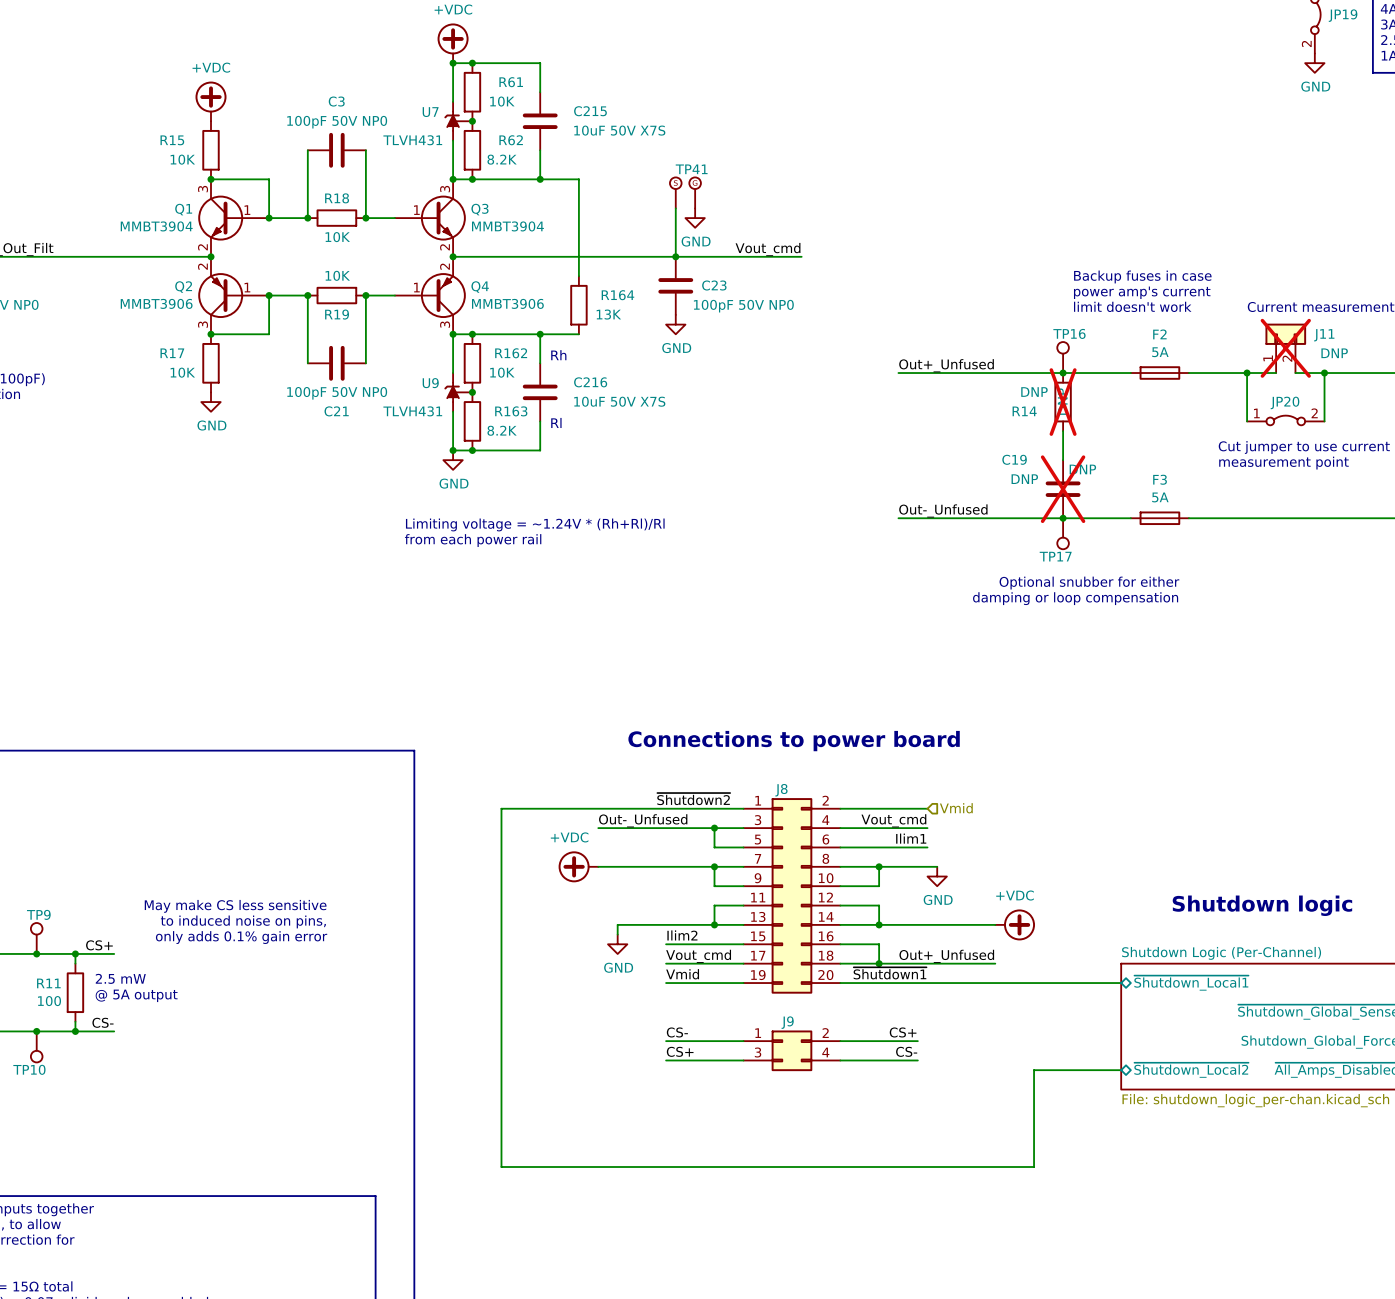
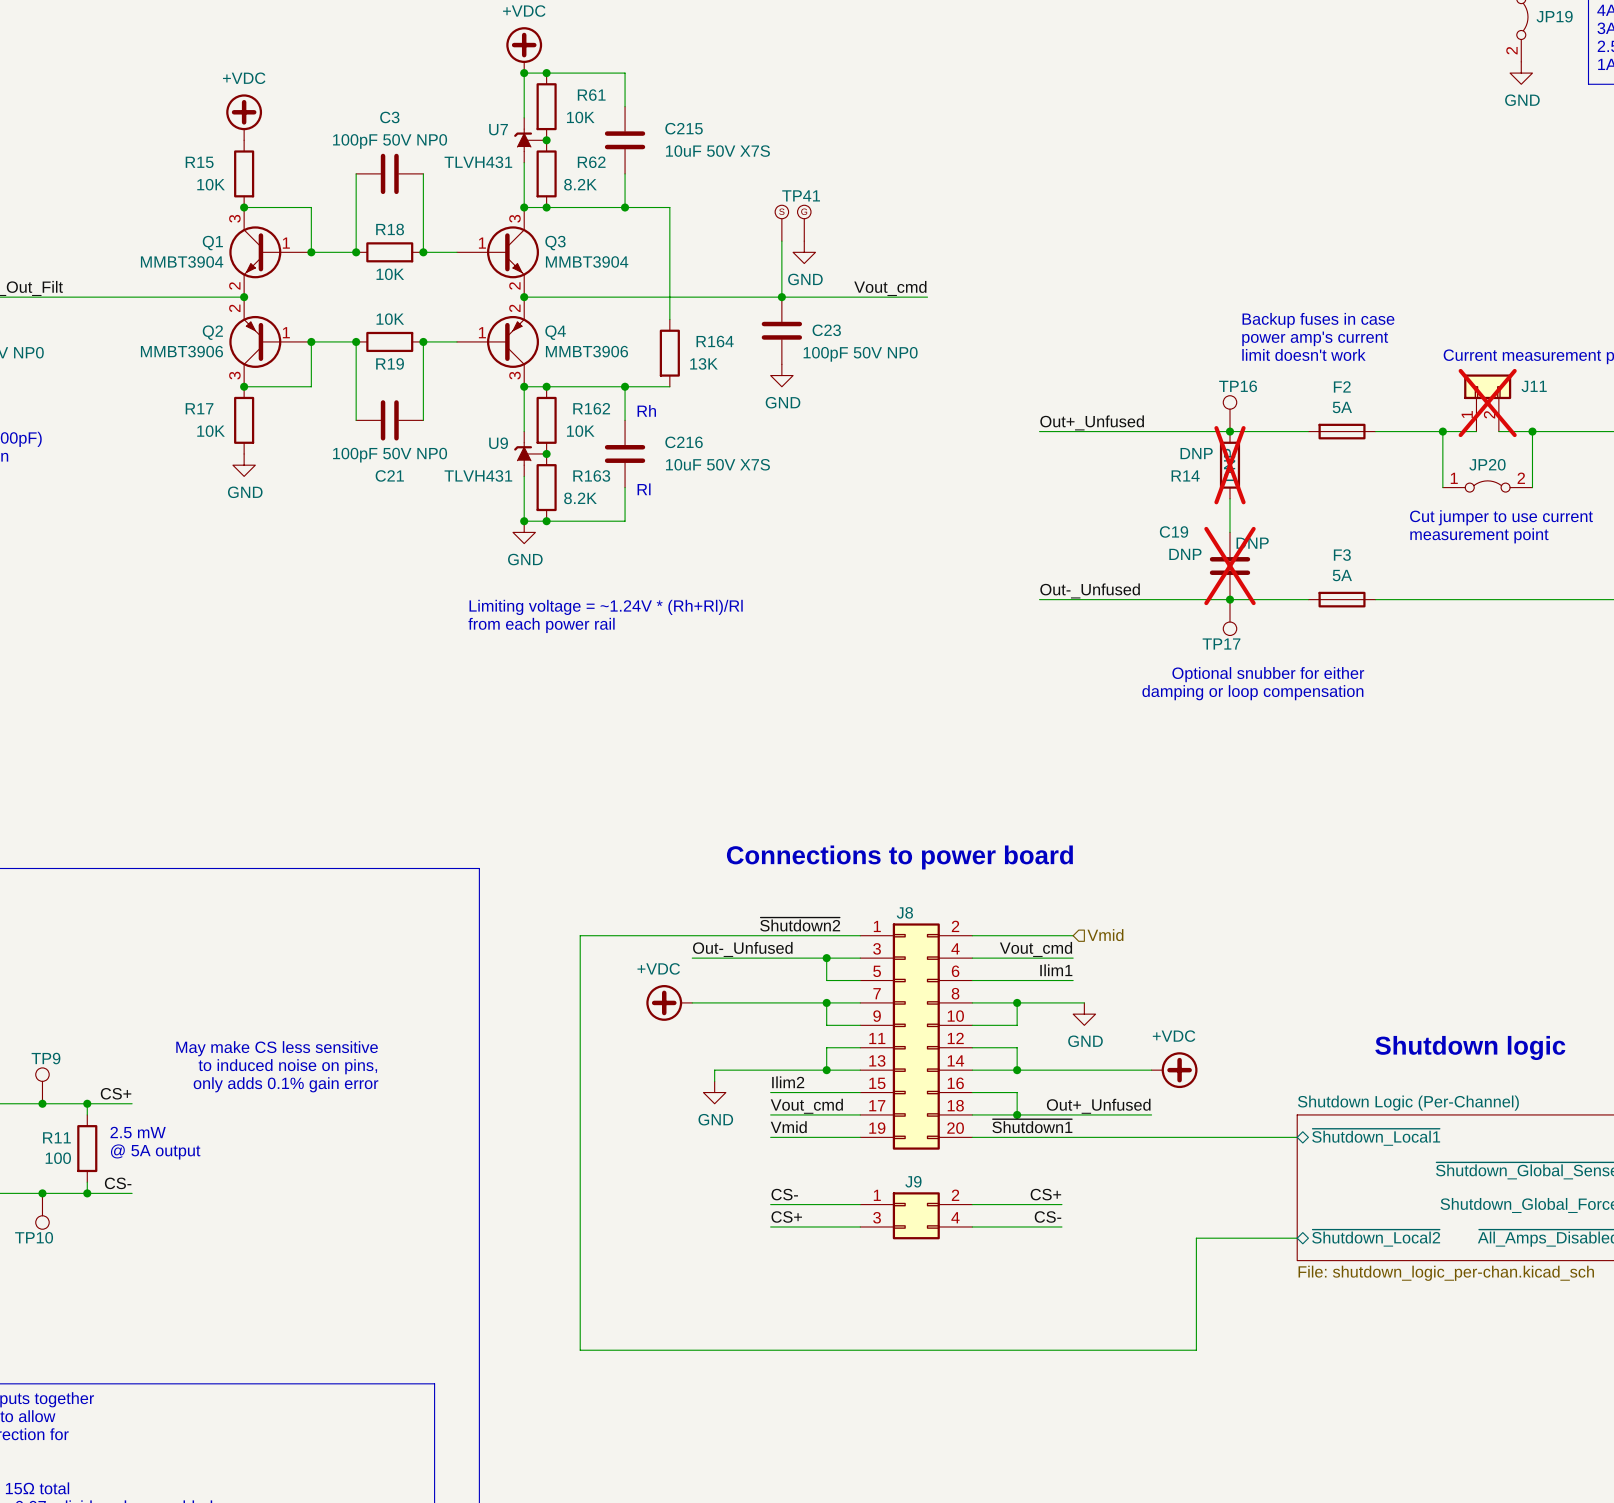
J11 text: DNP (1334, 353) -> none

